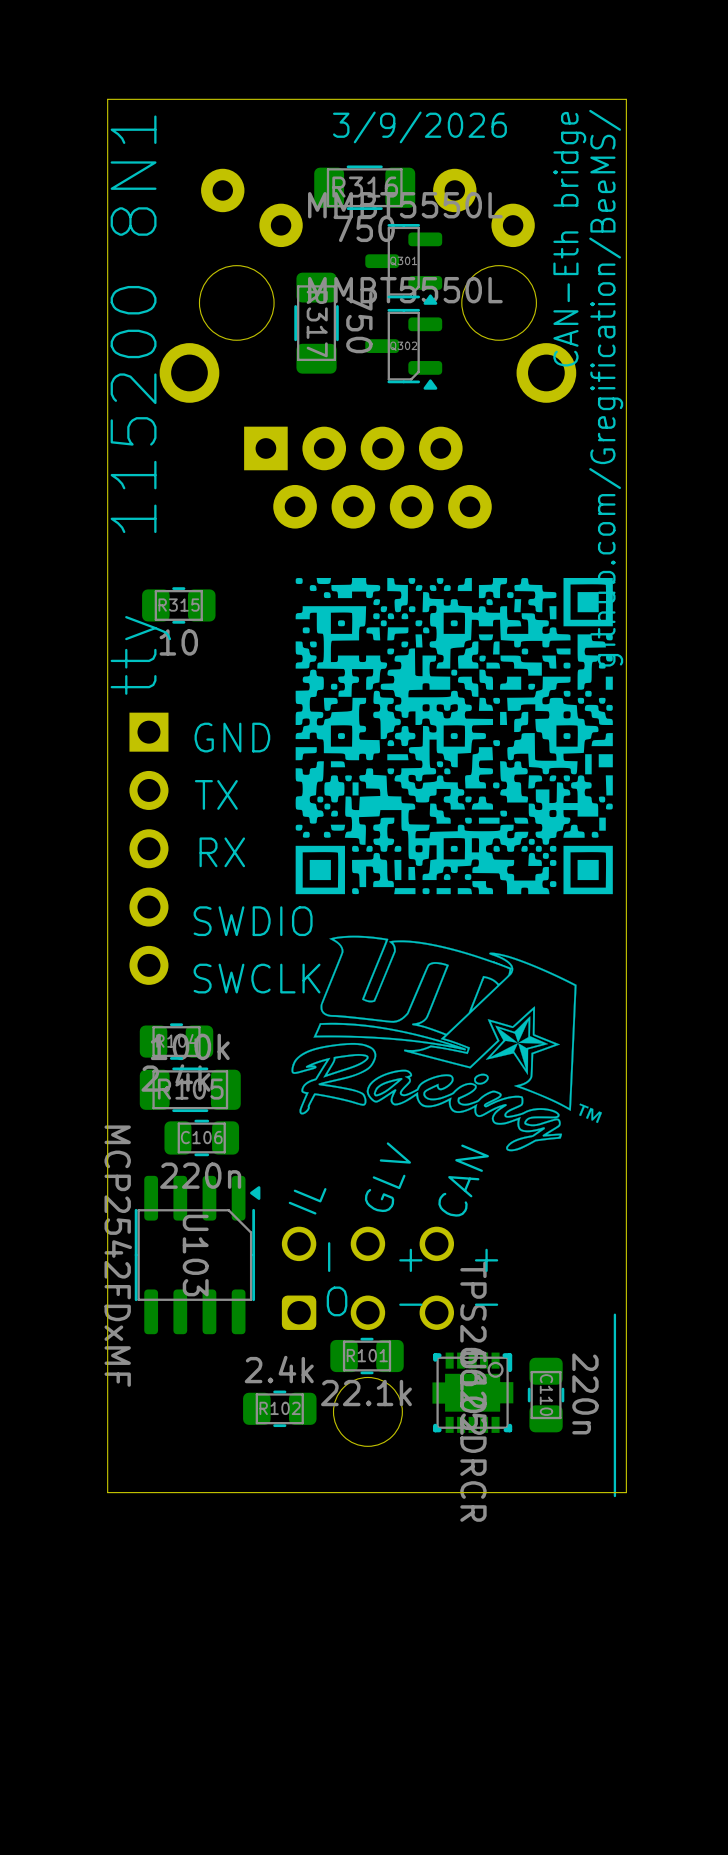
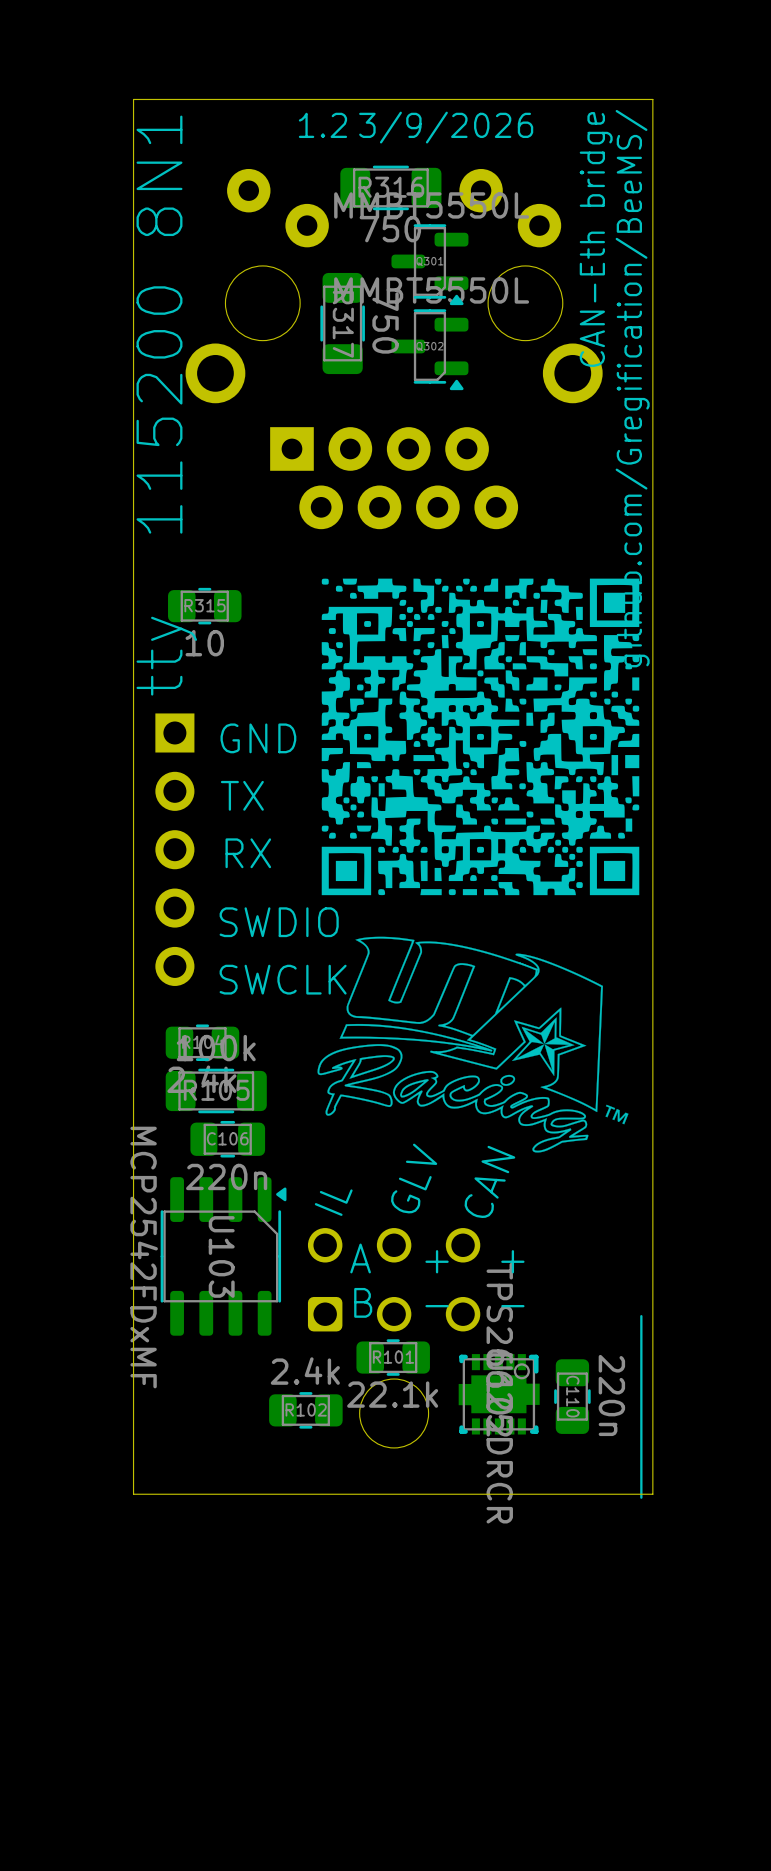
text: none -> 1.2 (322, 125)
text: I (329, 1257) -> A (360, 1258)
text: O (337, 1301) -> B (363, 1302)

